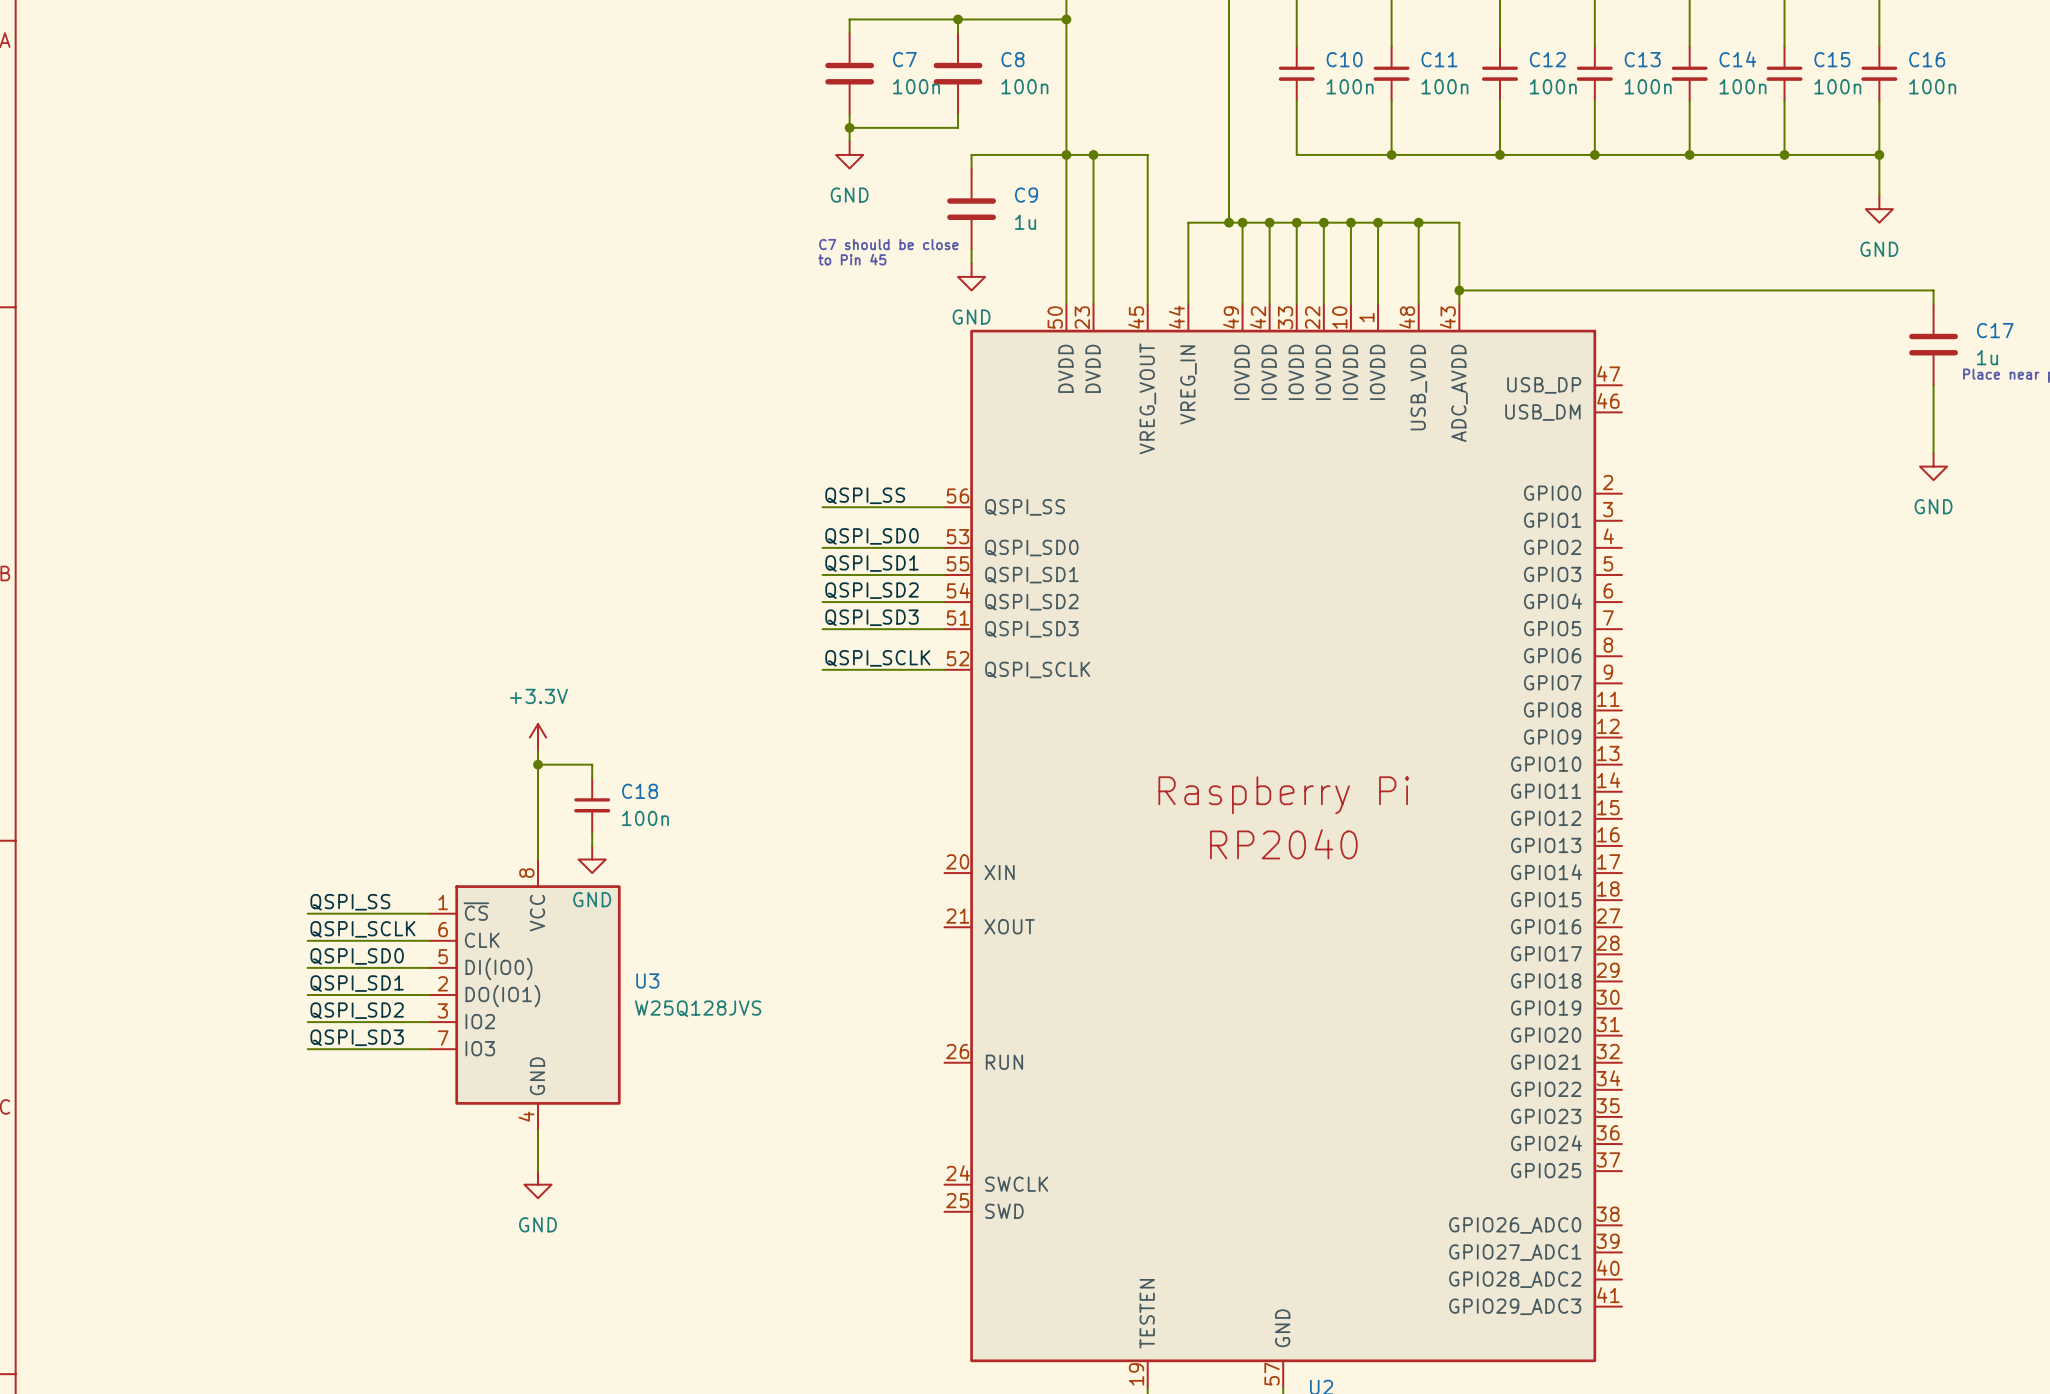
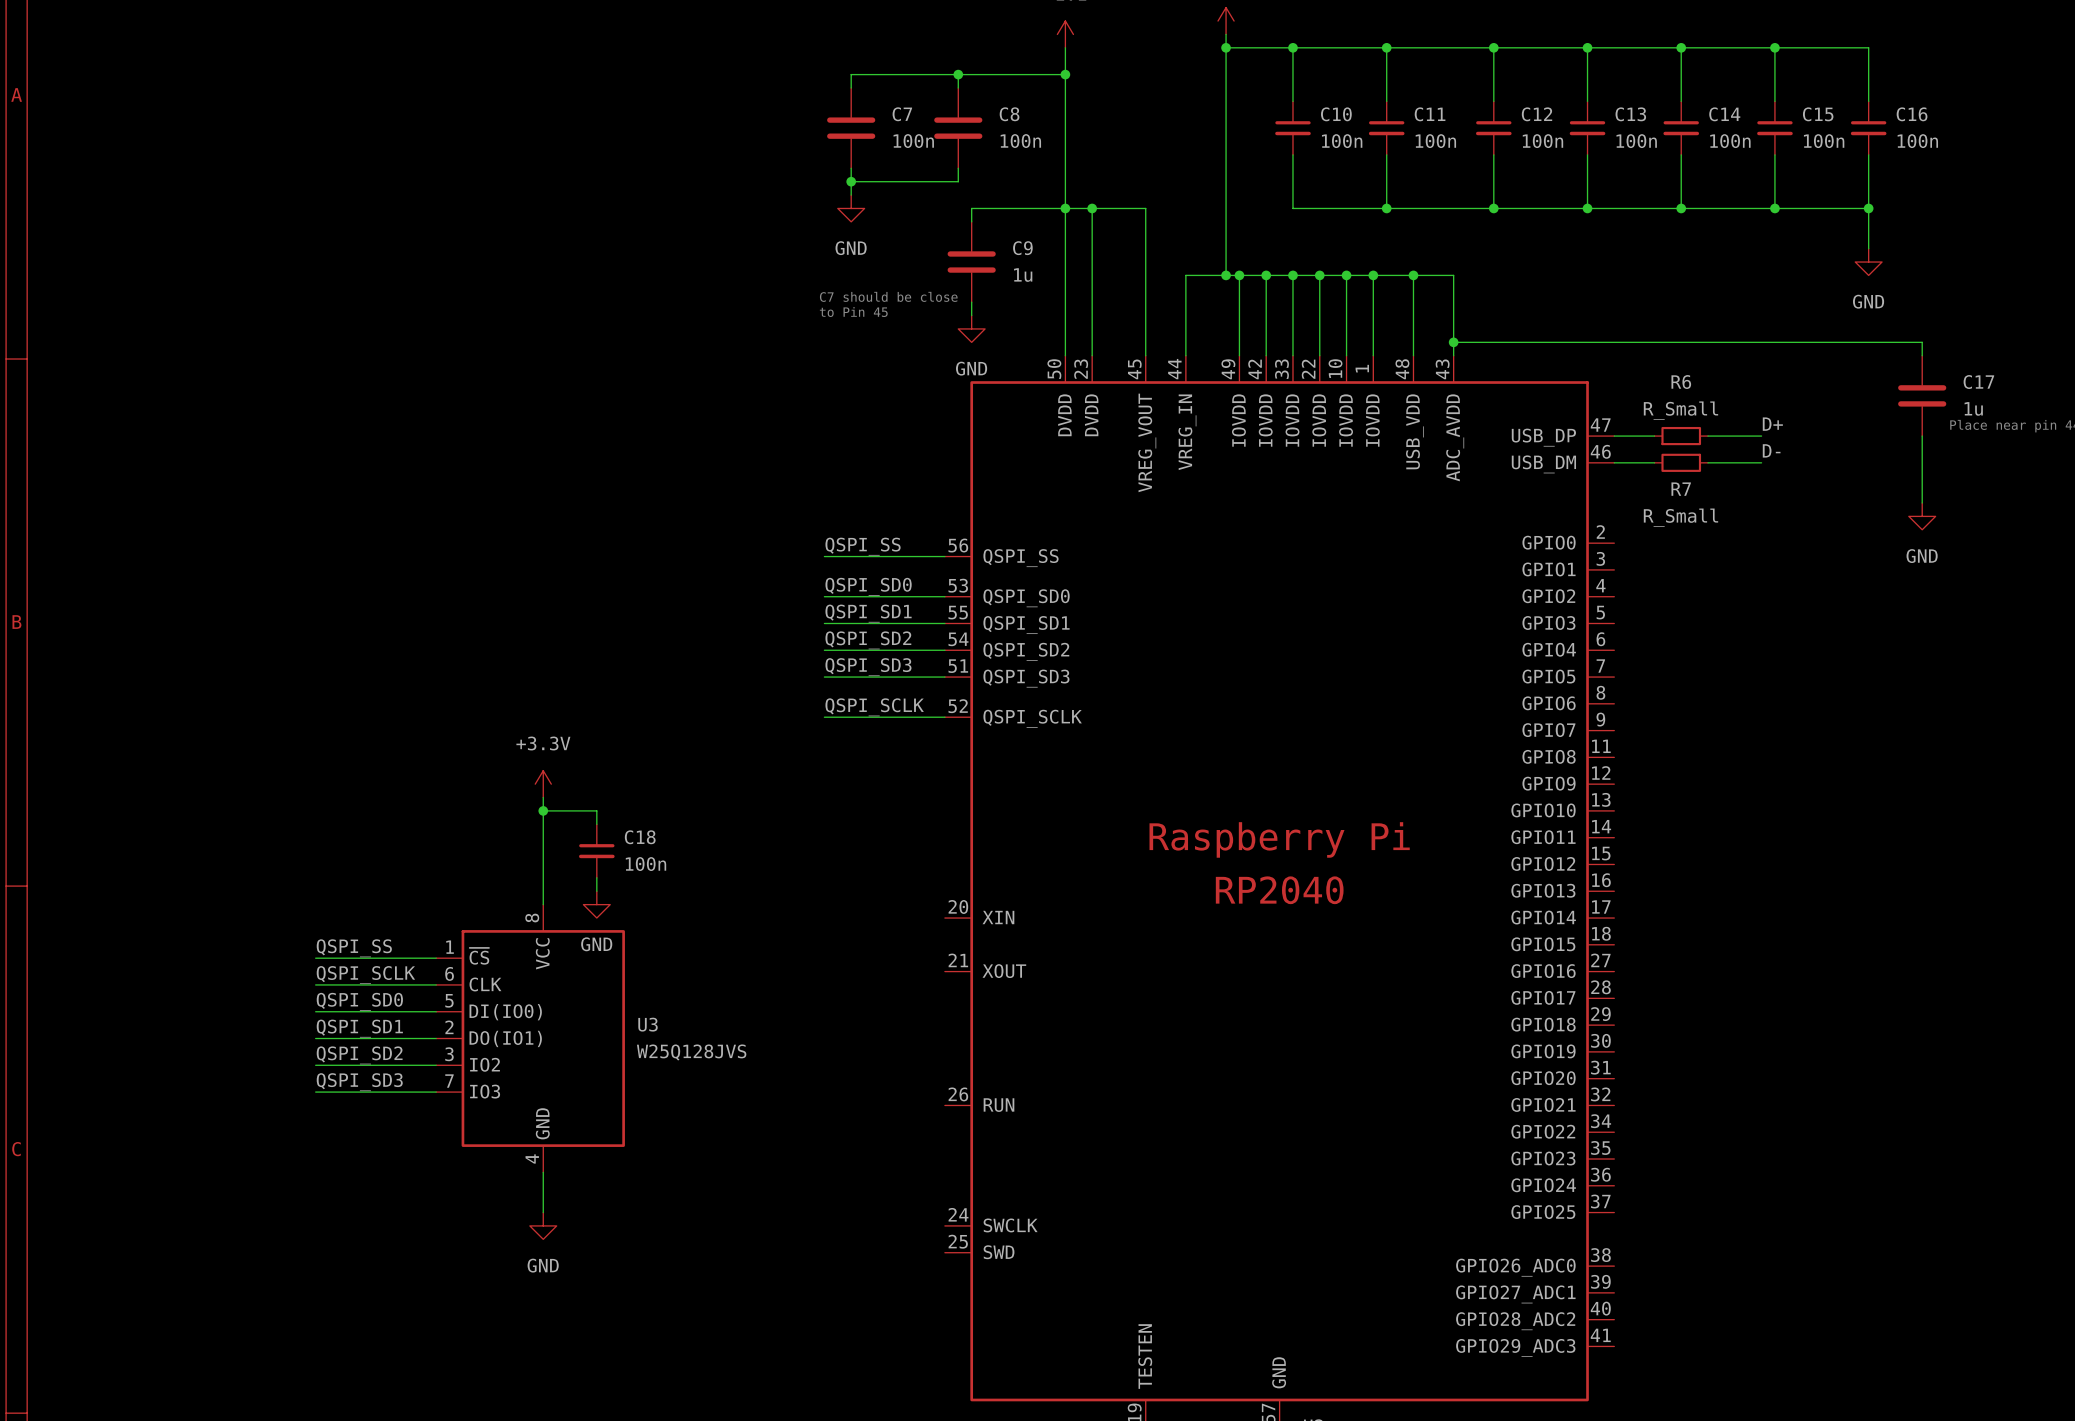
label: none -> D+ (1772, 424)
wire: none -> (1614, 436) (1654, 436)
R6: none -> R_Small (1681, 436)
wire: none -> (1708, 436) (1761, 436)
label: none -> D- (1771, 450)
wire: none -> (1614, 462) (1654, 462)
R7: none -> R_Small (1681, 462)
wire: none -> (1708, 462) (1761, 462)

